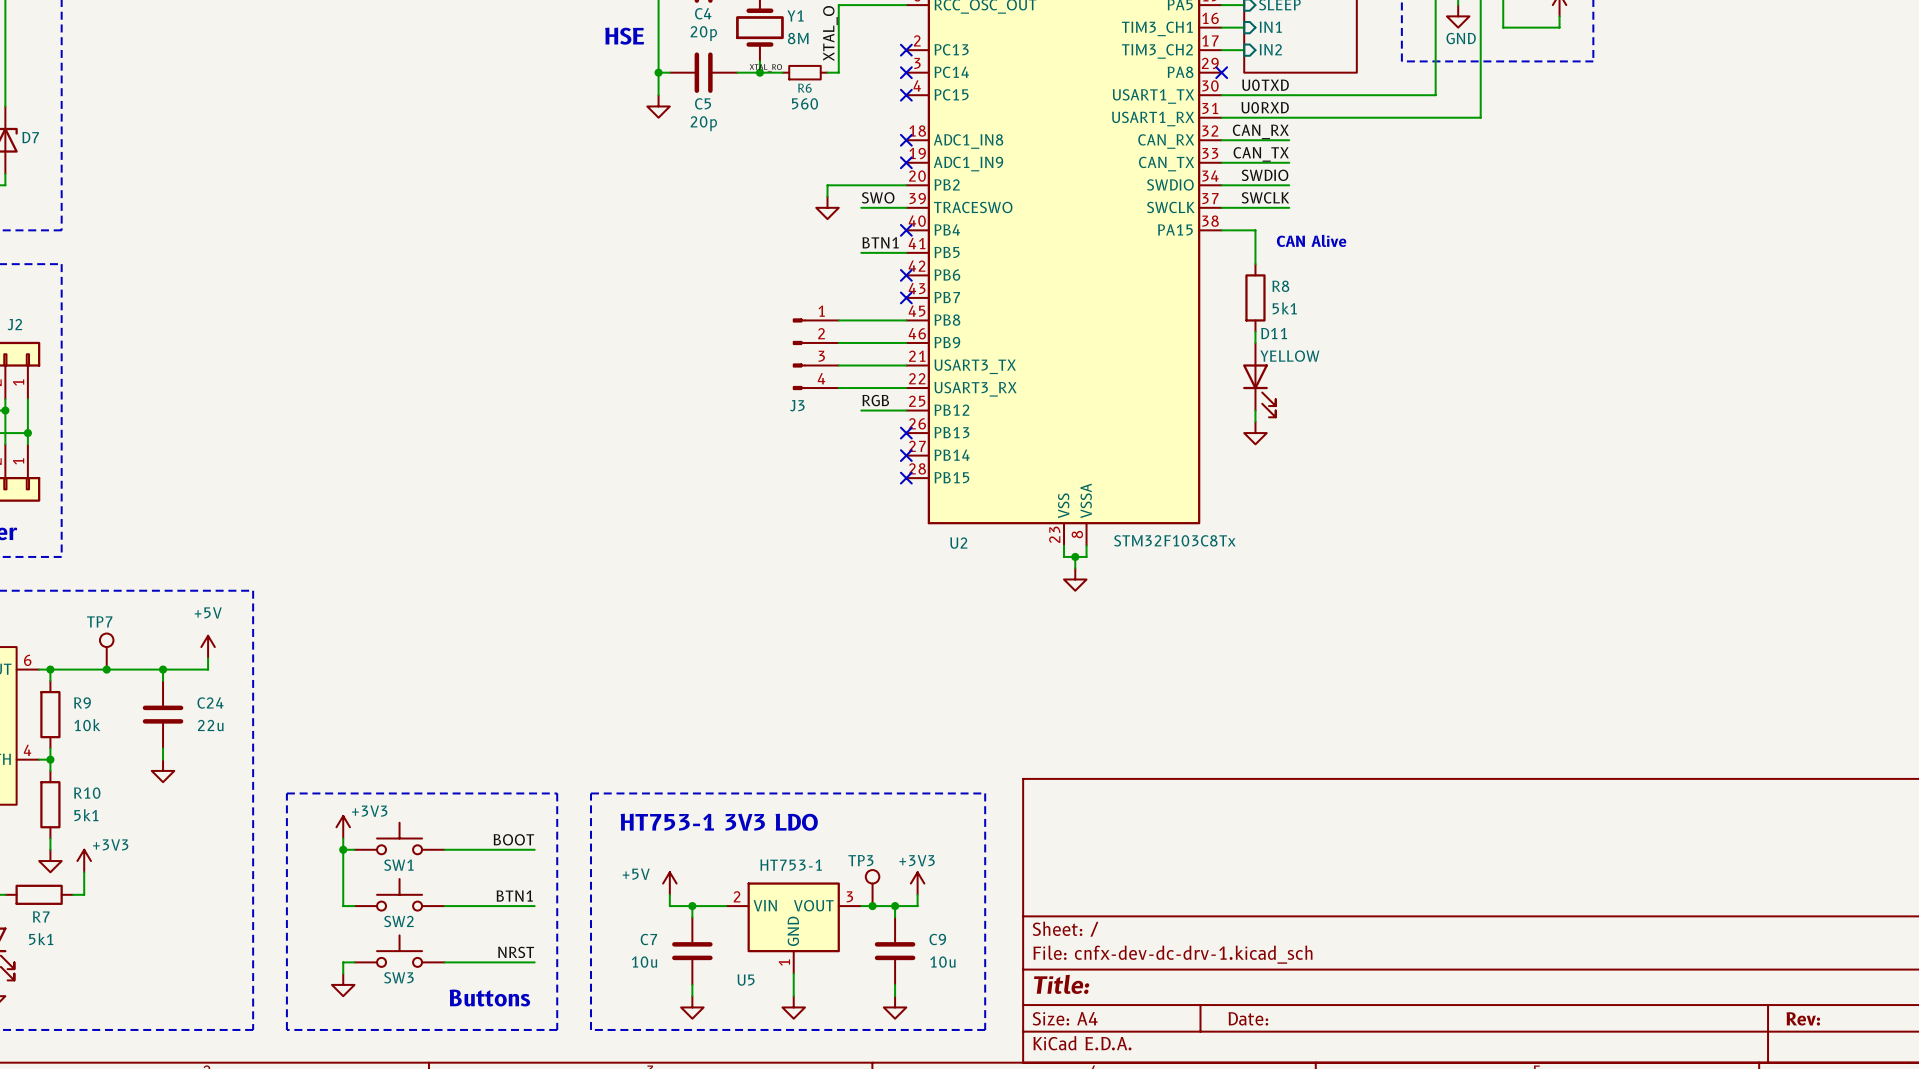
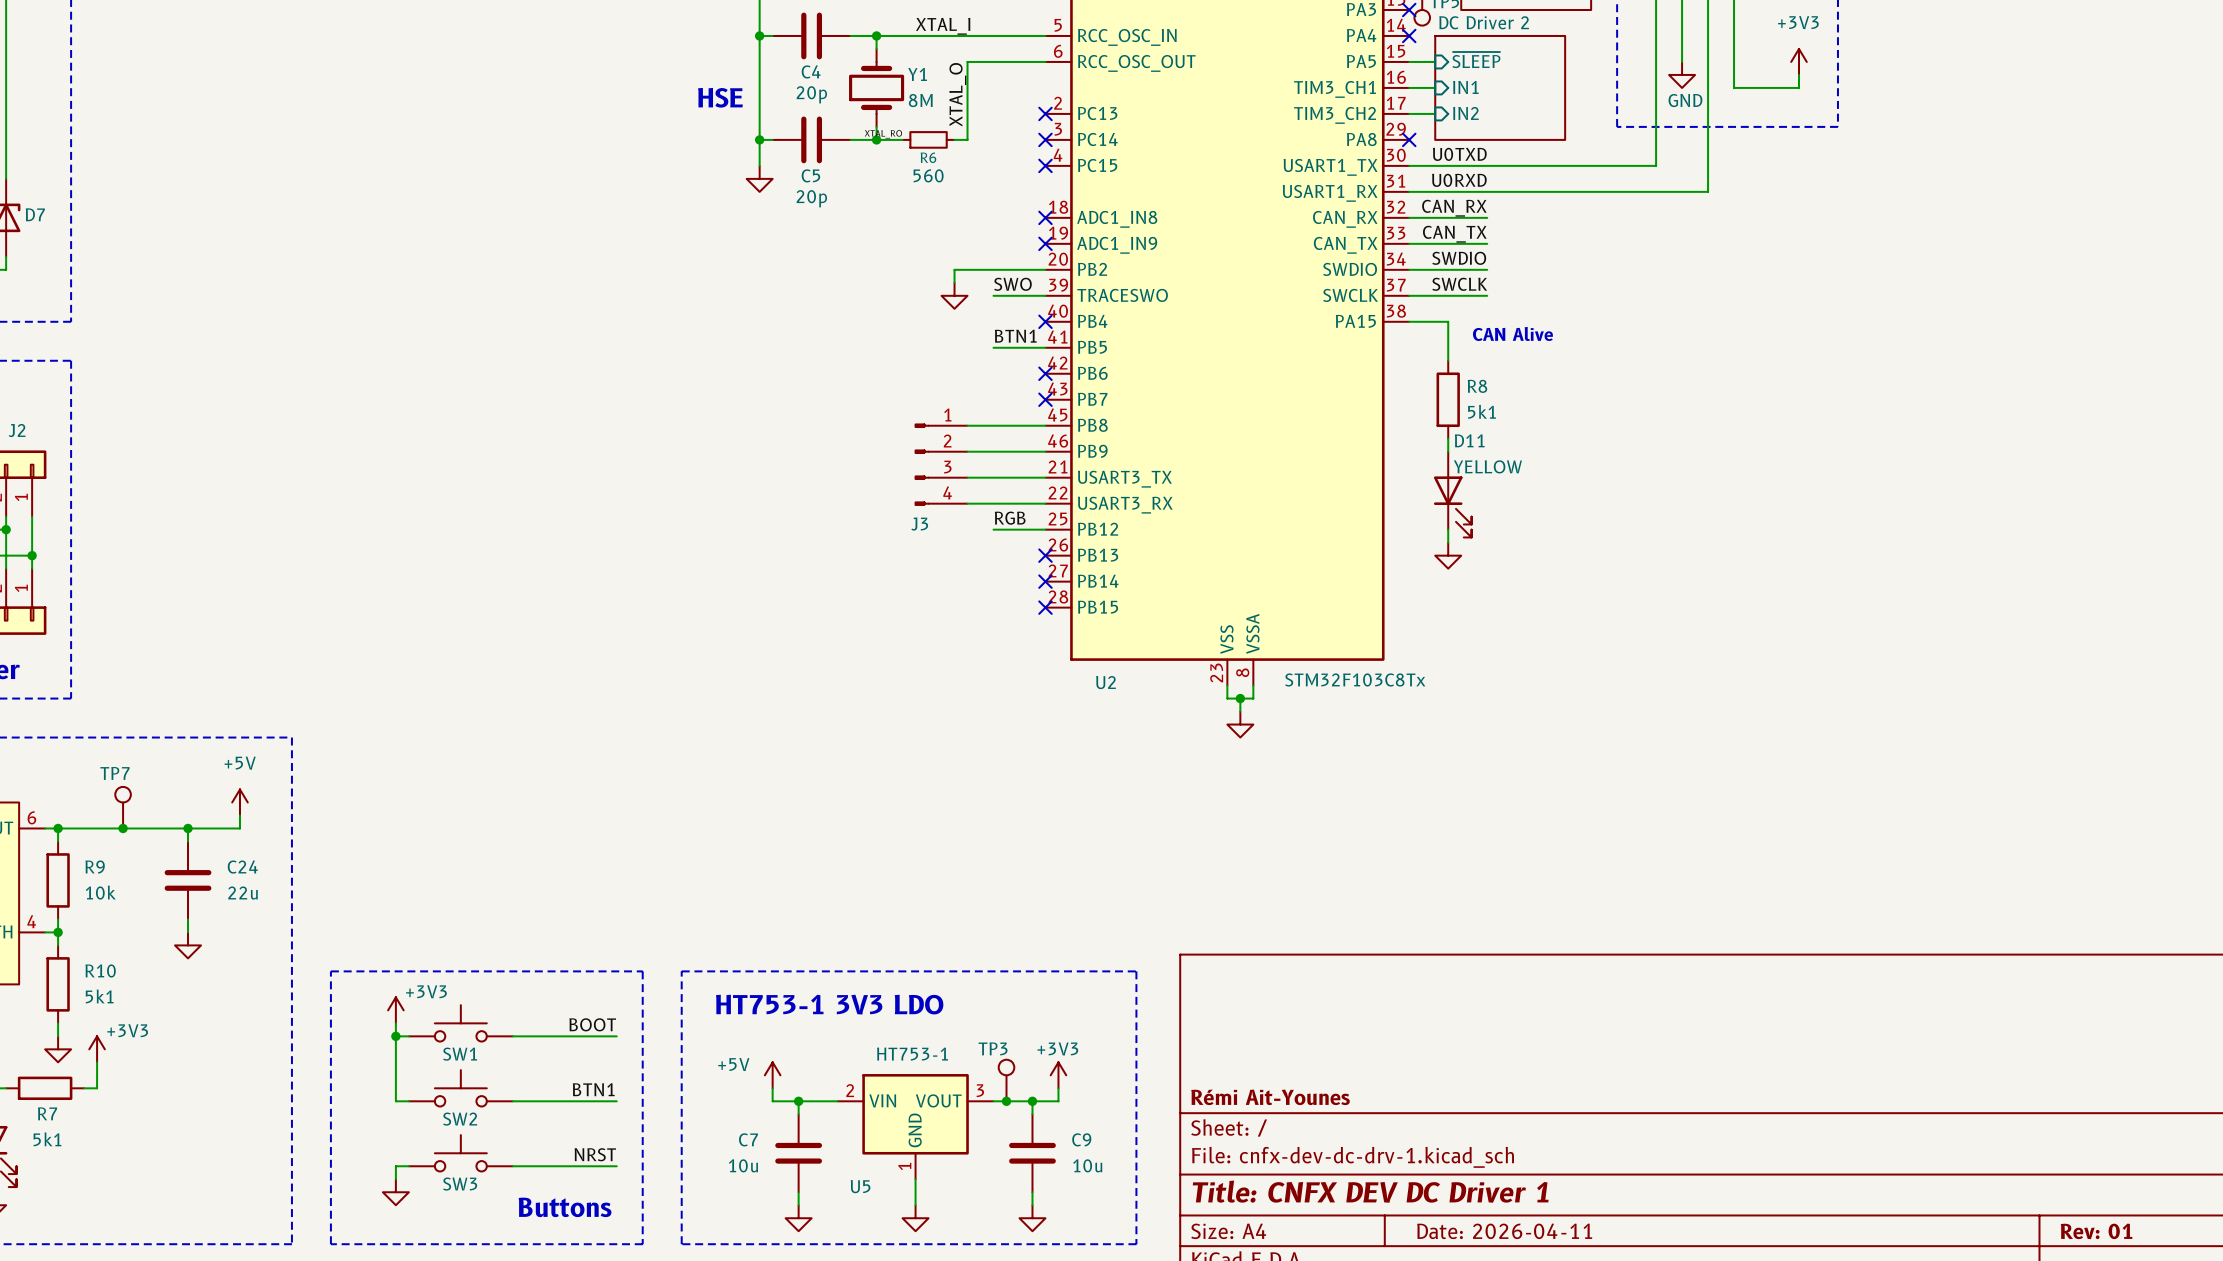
title block: none -> Rémi Ait-Younes (1270, 1097)
title block: Title: (1061, 984) -> Title: CNFX DEV DC Driver 1 (1370, 1191)
title block: Date: (1248, 1018) -> Date: 2026-04-11 (1504, 1231)
title block: Rev: (1803, 1018) -> Rev: 01 (2096, 1231)

